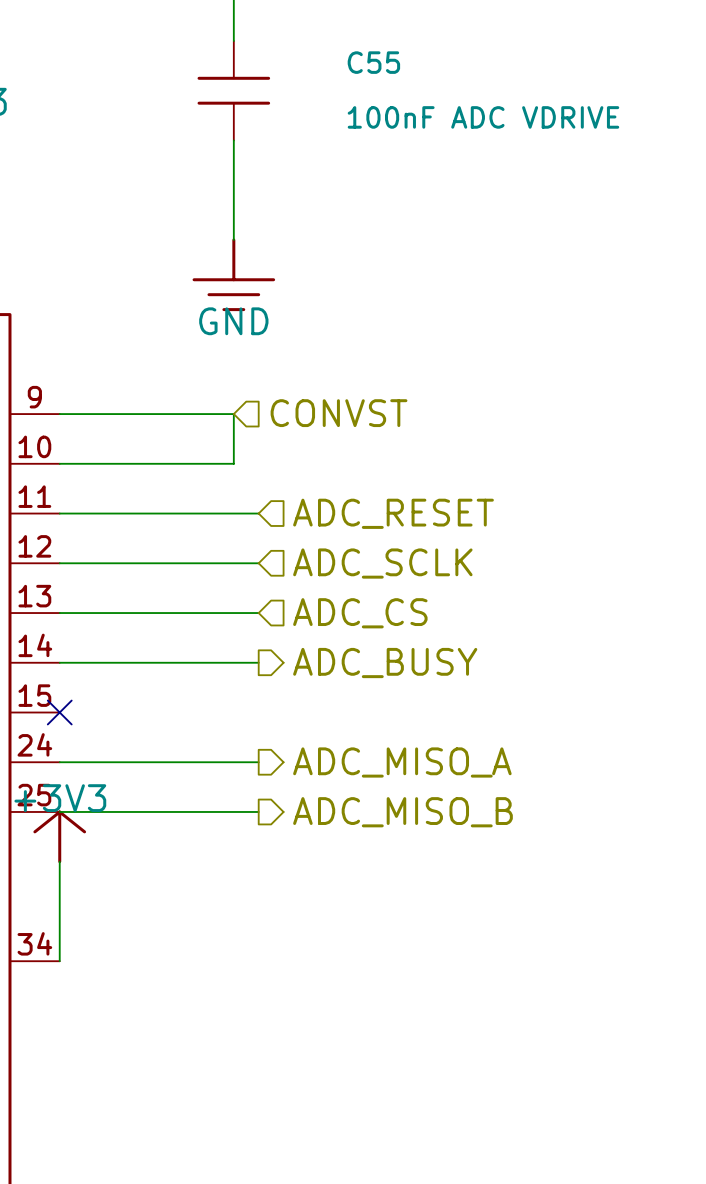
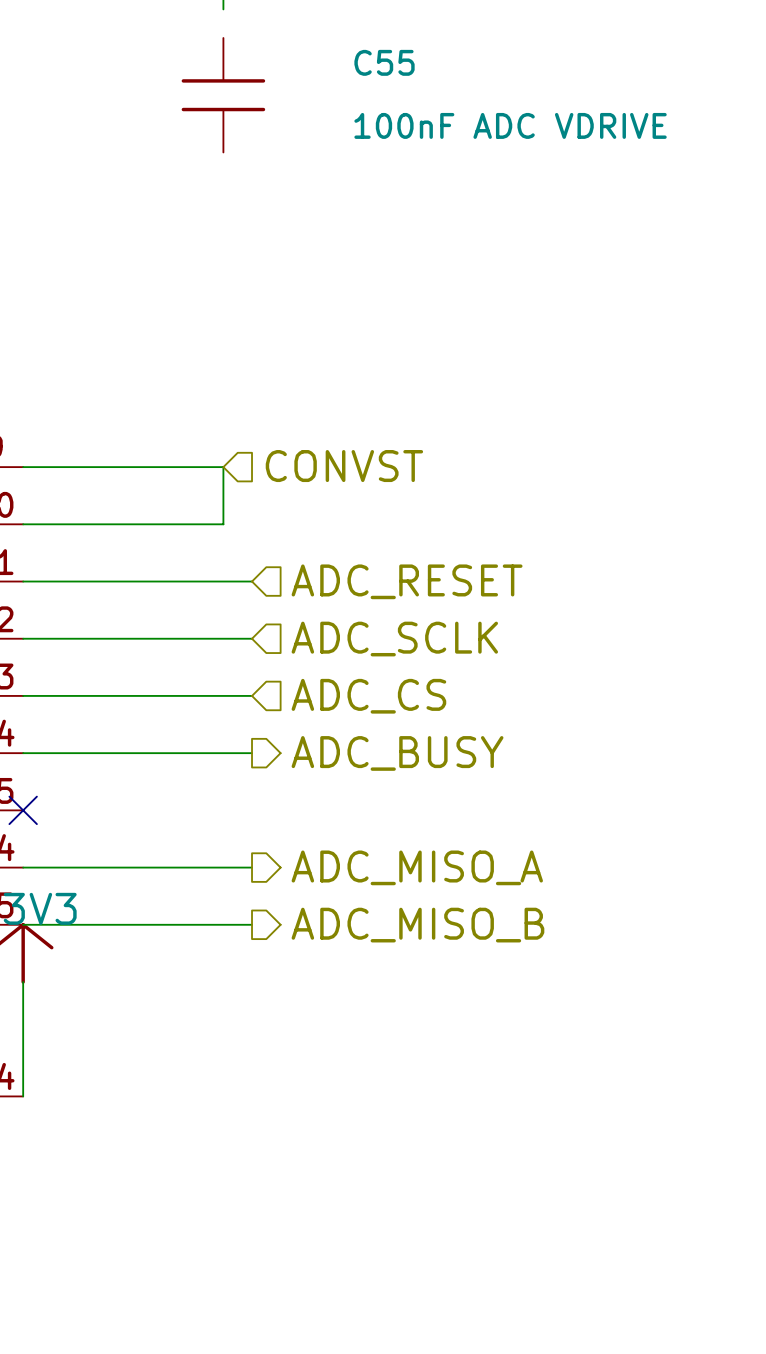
wire: (233, 16) (233, 41) -> none
wire: (233, 140) (233, 239) -> none
power symbol: GND (233, 274) -> none

